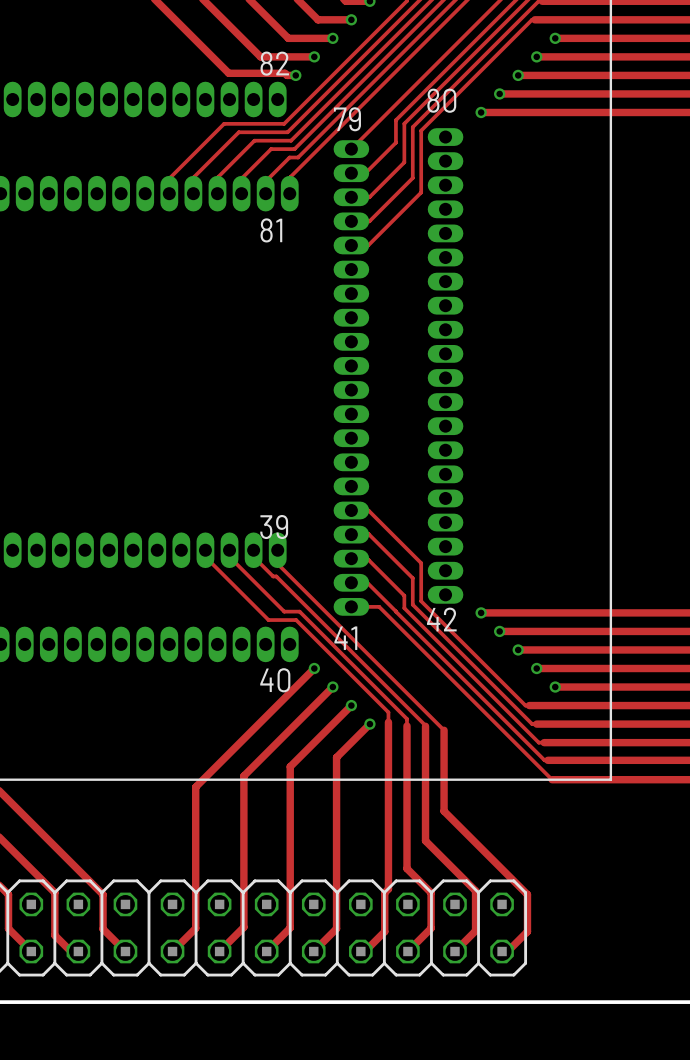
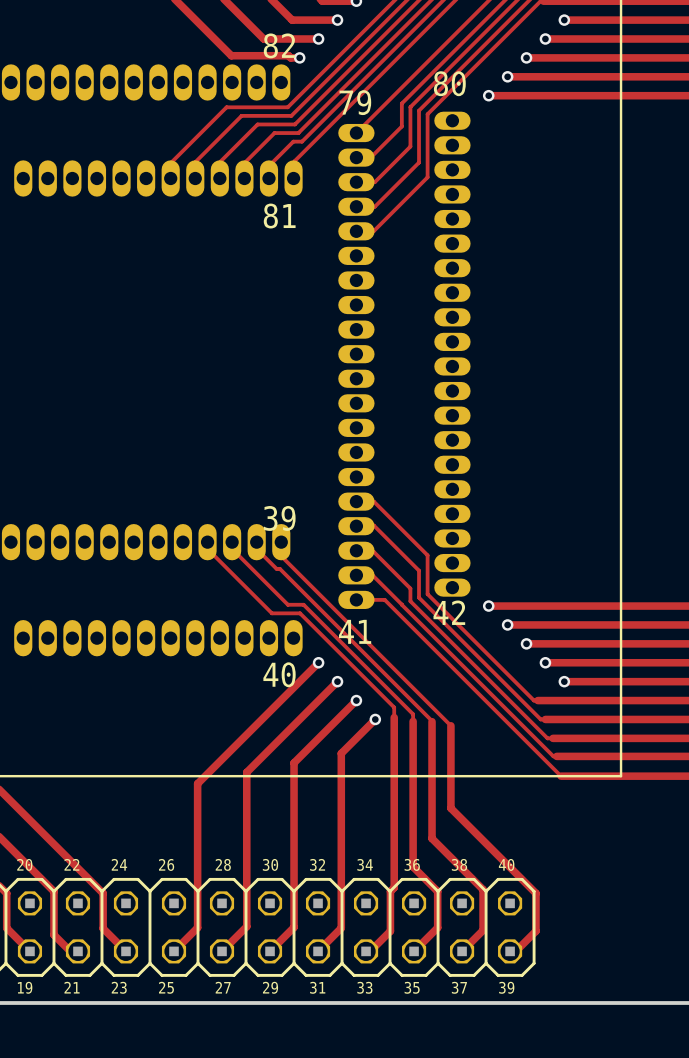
text: none -> 20 (24, 864)
text: none -> 22 (71, 864)
text: none -> 24 (119, 864)
text: none -> 26 (166, 864)
text: none -> 28 (223, 864)
text: none -> 30 (270, 864)
text: none -> 32 (317, 864)
text: none -> 34 (365, 864)
text: none -> 36 (412, 864)
text: none -> 38 (459, 864)
text: none -> 40 (506, 864)
text: none -> 19 (25, 987)
text: none -> 21 (72, 987)
text: none -> 23 (119, 987)
text: none -> 25 (166, 987)
text: none -> 27 (223, 987)
text: none -> 29 (270, 987)
text: none -> 31 (317, 987)
text: none -> 33 (364, 987)
text: none -> 35 (412, 987)
text: none -> 37 (459, 987)
text: none -> 39 (506, 987)

